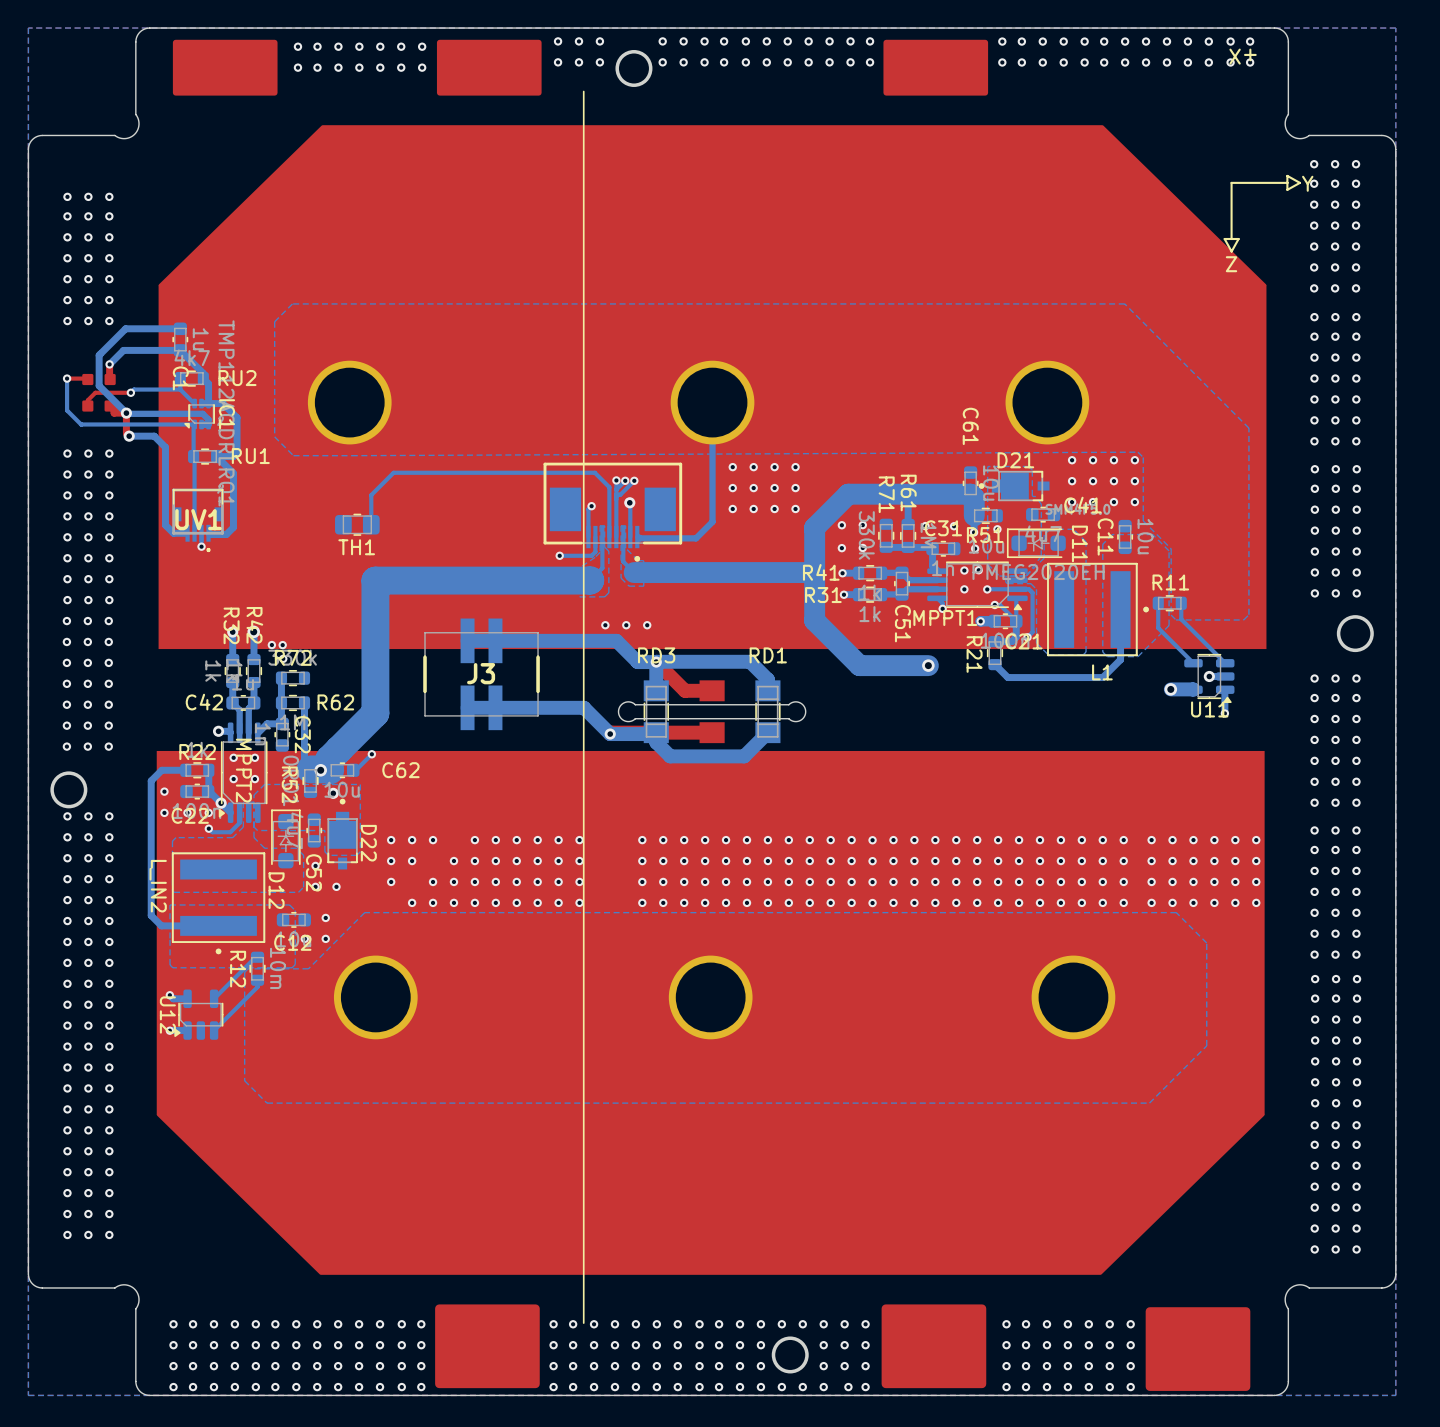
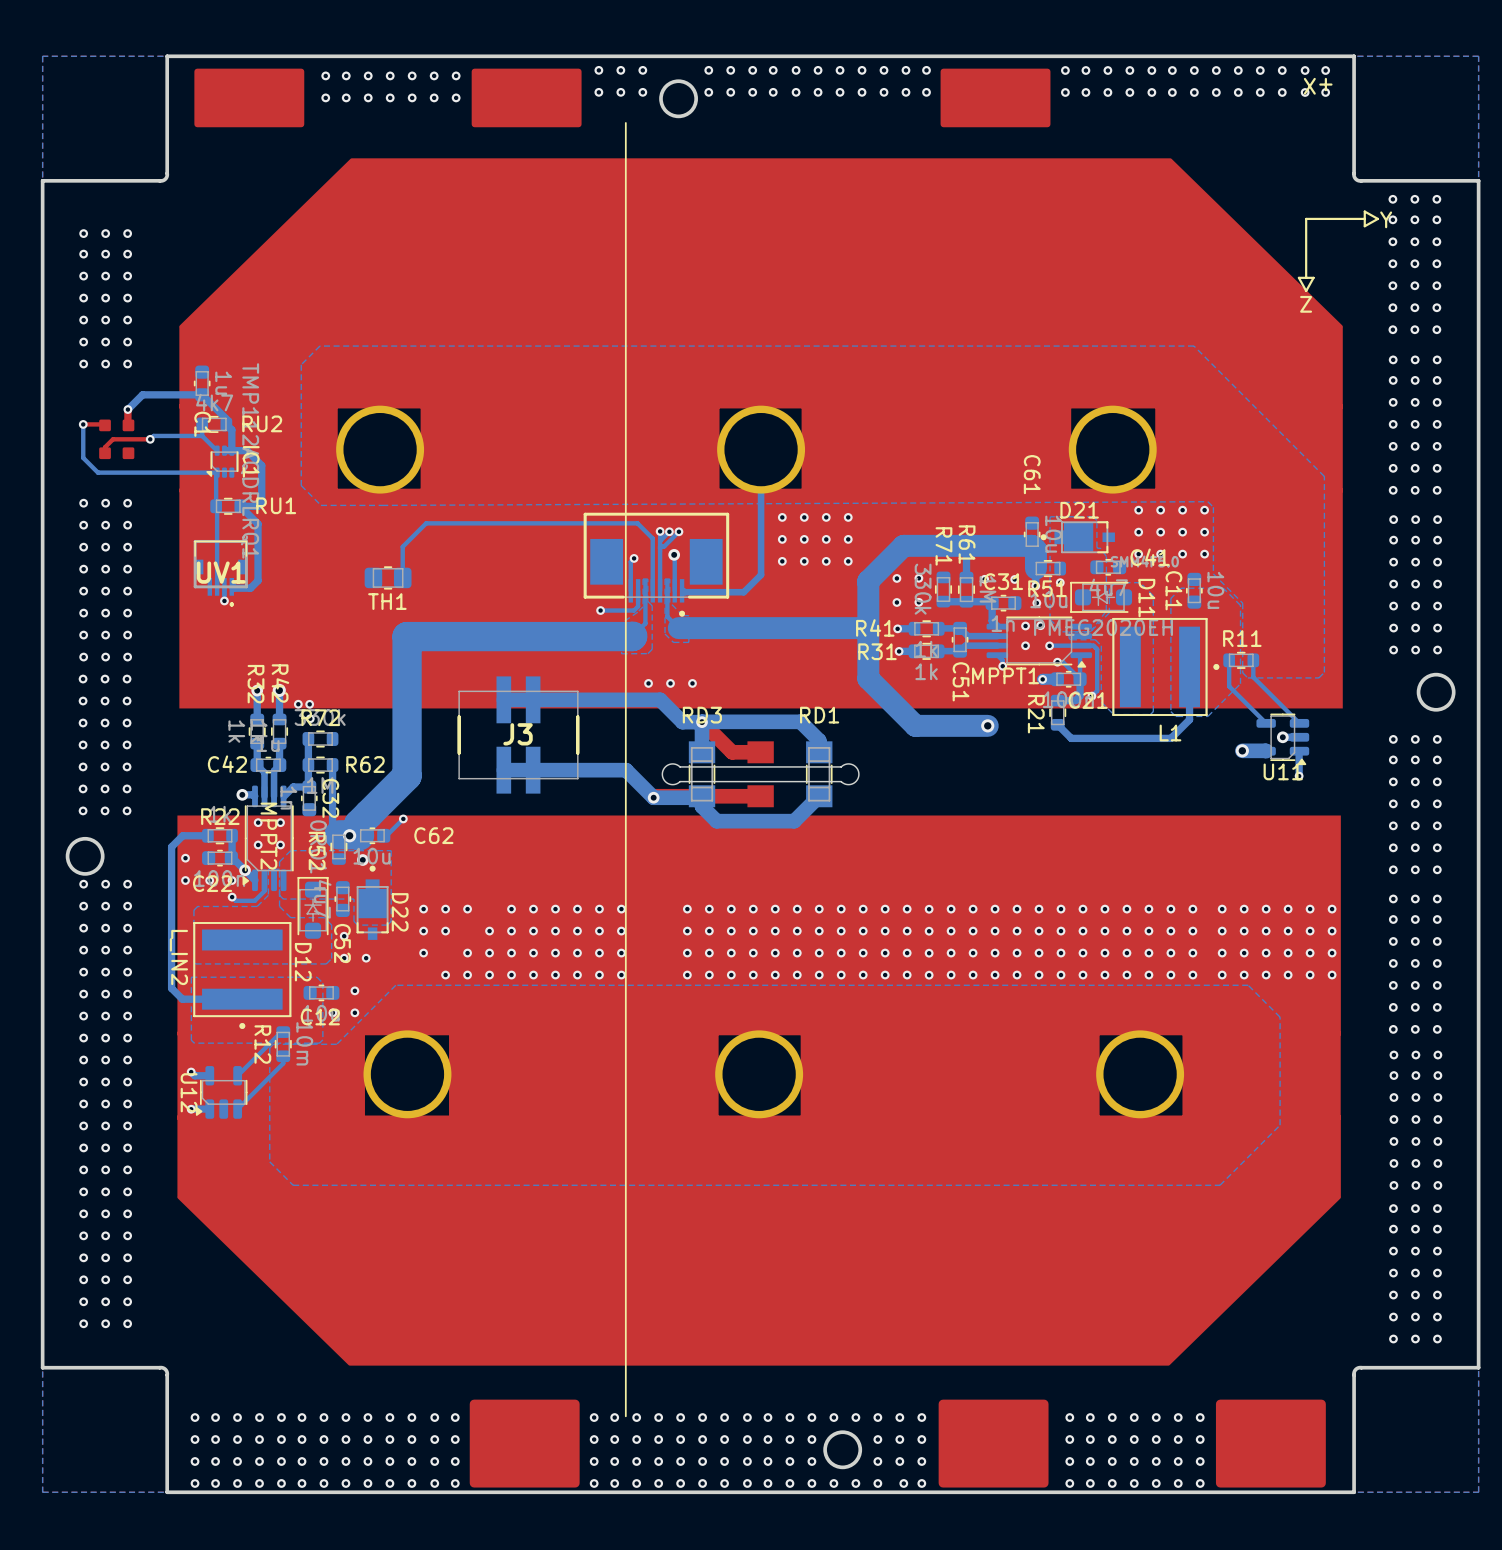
drawing shape: [27, 27, 1397, 1397] -> [40, 54, 1481, 1495]
part footprint: [158, 39, 1267, 650] -> [179, 68, 1343, 709]
bottom track: (180, 328) (125, 328) (99, 355) (99, 385) (127, 413) (202, 413) (208, 419) (208, 424) (202, 424) -> none
top track: (110, 406) (114, 409) (114, 413) (126, 413) (126, 433) (129, 436) -> none
via: (126, 413) -> none
bottom track: (129, 436) (154, 436) (165, 447) (165, 525) (173, 533) (186, 533) -> none
via: (129, 436) -> none
part footprint: [156, 750, 1265, 1391] -> [177, 815, 1341, 1488]

